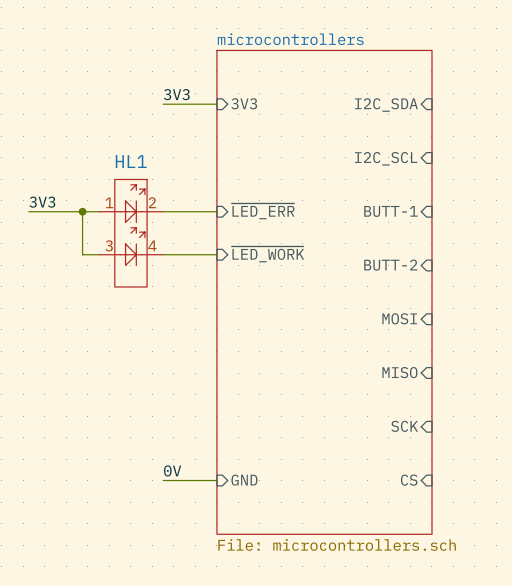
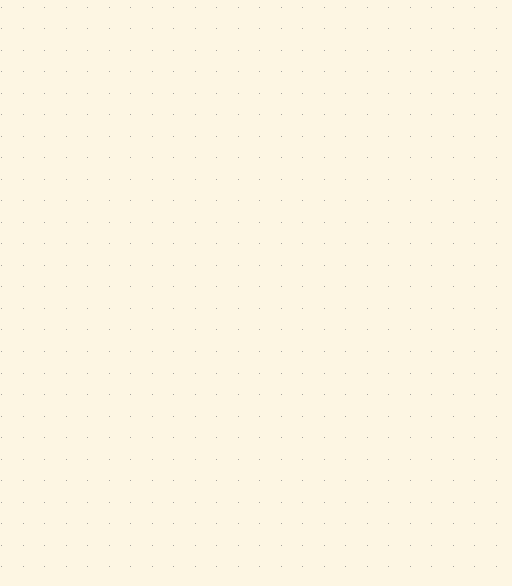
label: 3V3 (176, 94) -> none
sheet pin: 3V3 (244, 103) -> none
wire: (163, 104) (216, 104) -> none
sheet pin: I2C_SDA (386, 105) -> none
sheet pin: I2C_SCL (386, 158) -> none
label: 3V3 (42, 202) -> none
wire: (28, 211) (98, 211) -> none
wire: (82, 211) (82, 254) (98, 254) -> none
junction: (82, 211) -> none
wire: (163, 211) (216, 211) -> none
sheet pin: ~{LED_ERR} (263, 211) -> none
sheet pin: BUTT-1 (390, 211) -> none
HL1: (130, 233) -> none
wire: (163, 254) (216, 254) -> none
sheet pin: ~{LED_WORK} (267, 254) -> none
sheet pin: BUTT-2 (390, 265) -> none
sheet microcontrollers: File: microcontrollers.sch (324, 292) -> none
sheet pin: MOSI (399, 318) -> none
sheet pin: MISO (399, 372) -> none
sheet pin: SCK (404, 426) -> none
label: 0V (172, 470) -> none
wire: (163, 480) (216, 480) -> none
sheet pin: GND (244, 480) -> none
sheet pin: CS (409, 480) -> none

